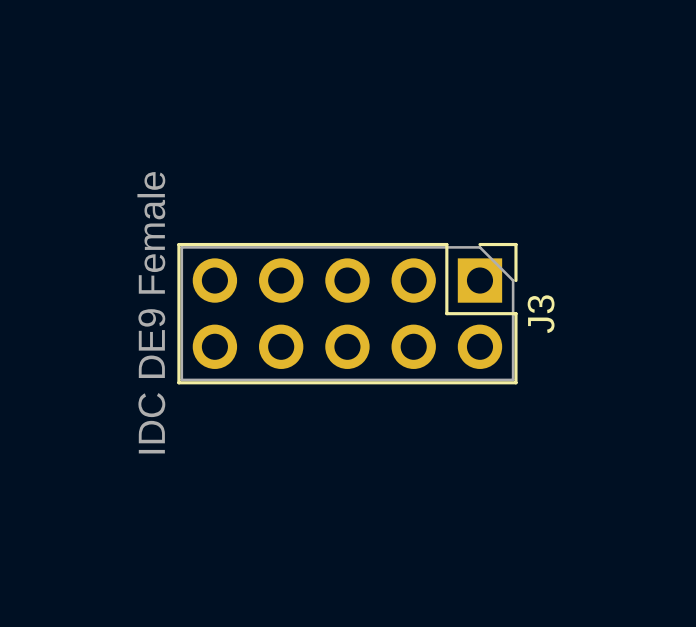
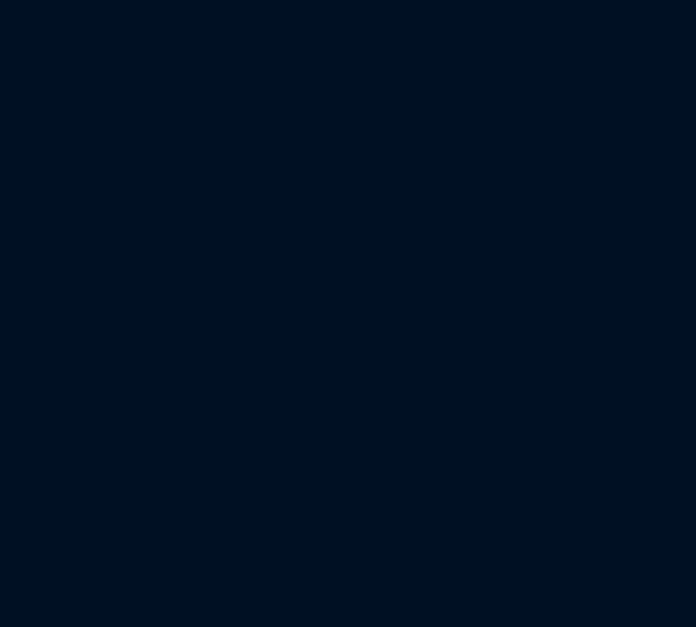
J3: IDC DE9 Female (347, 313) -> none

